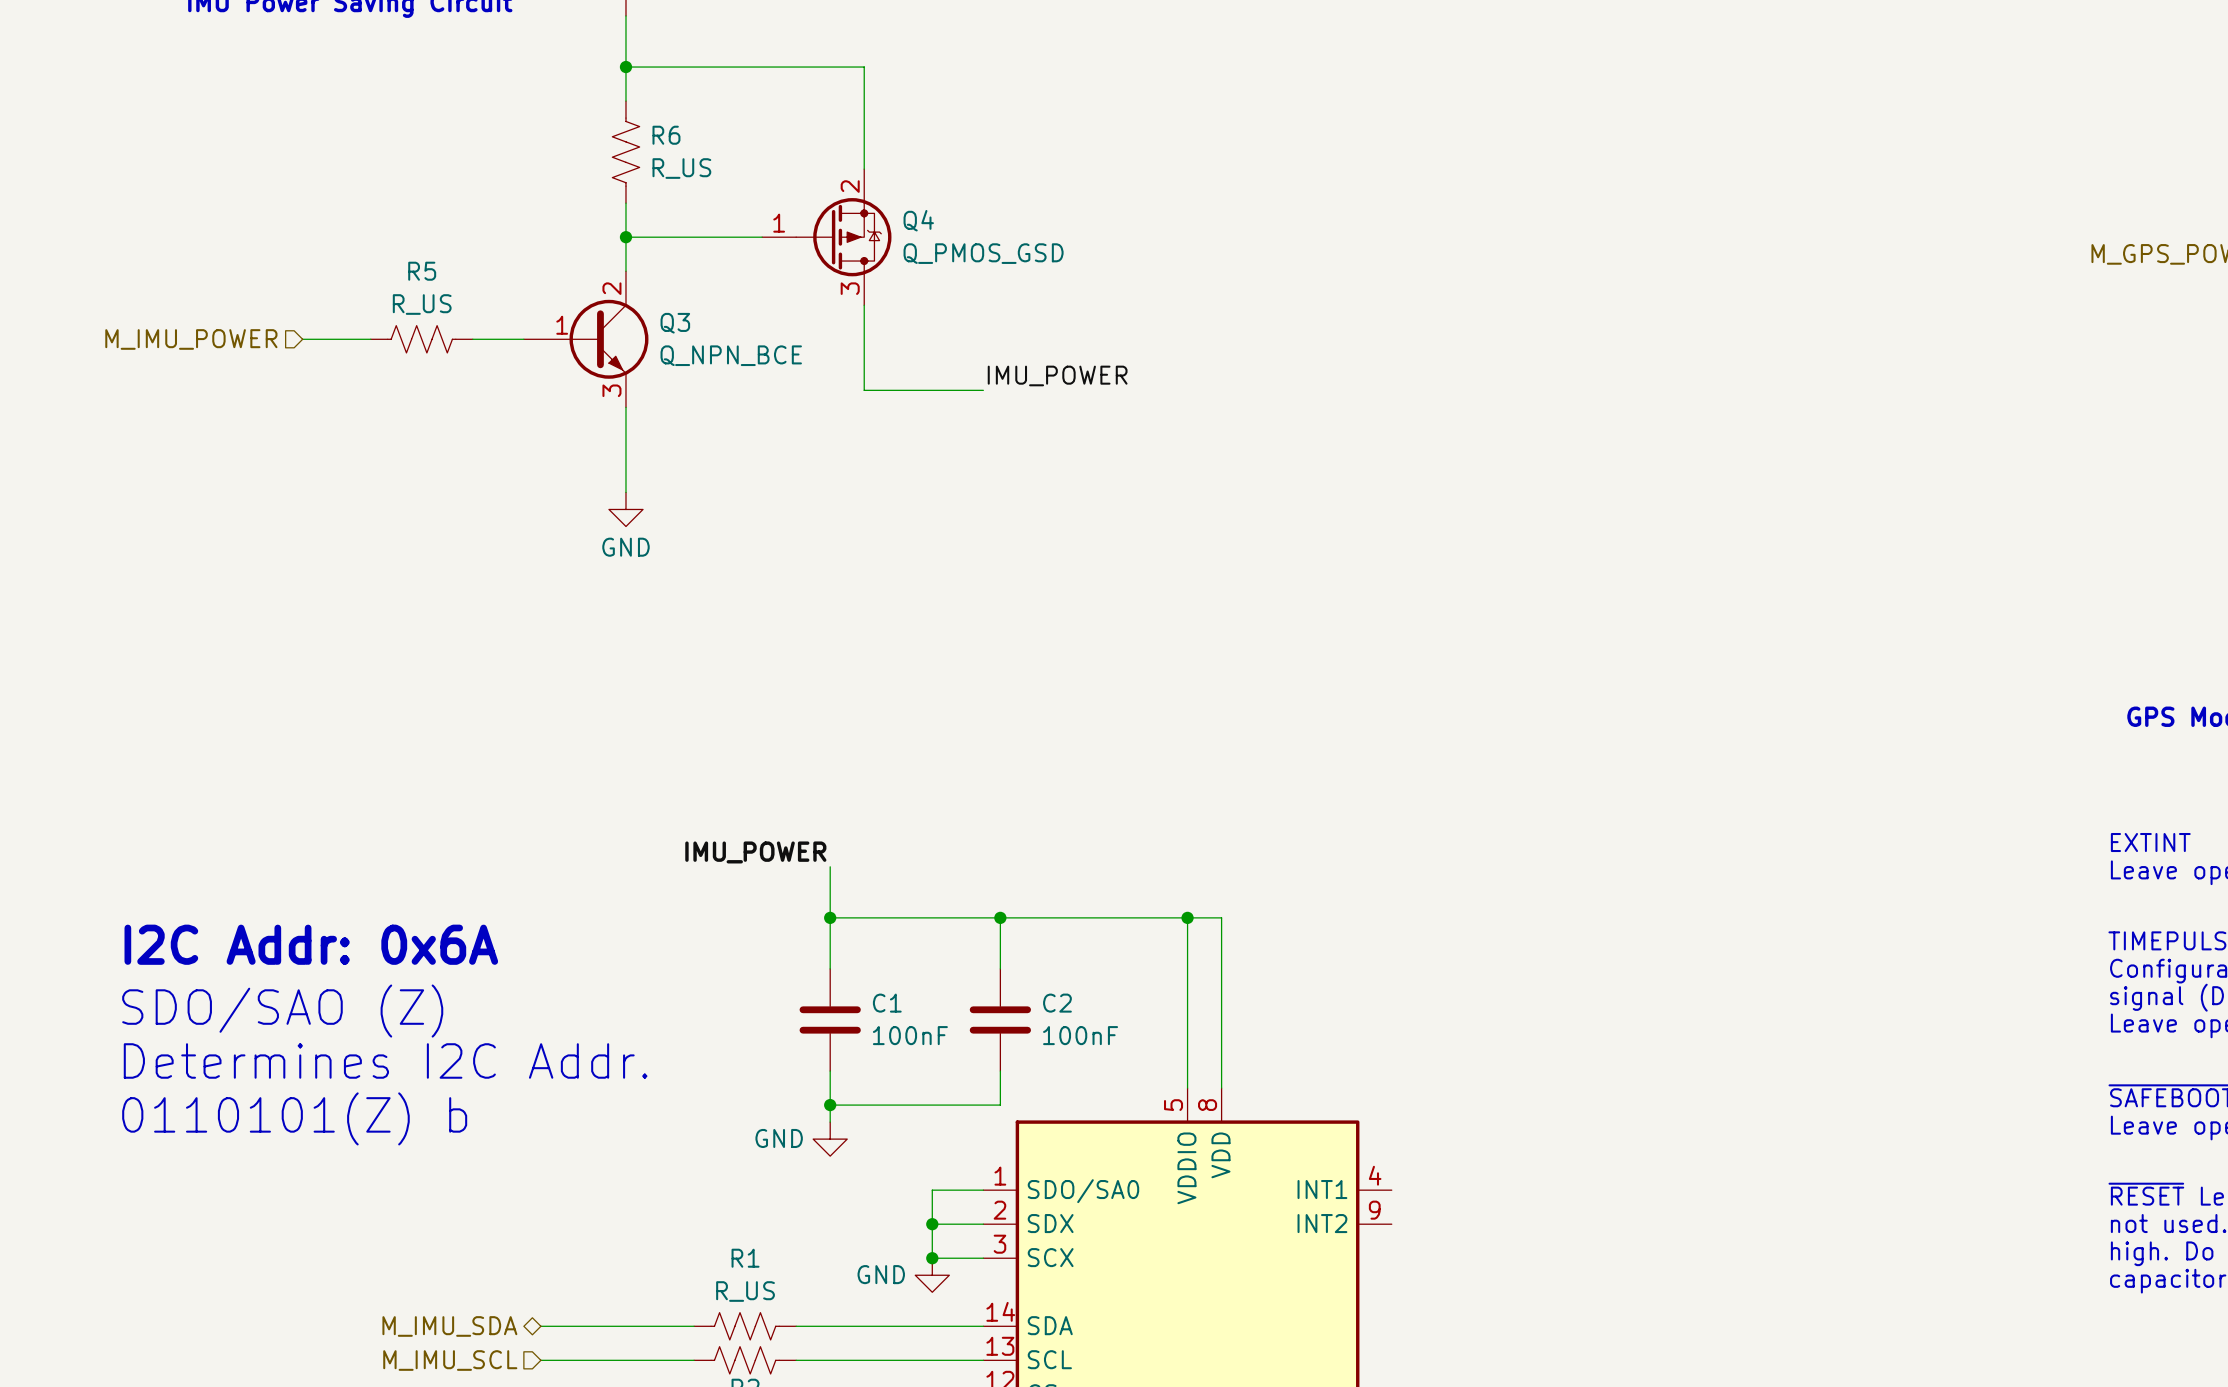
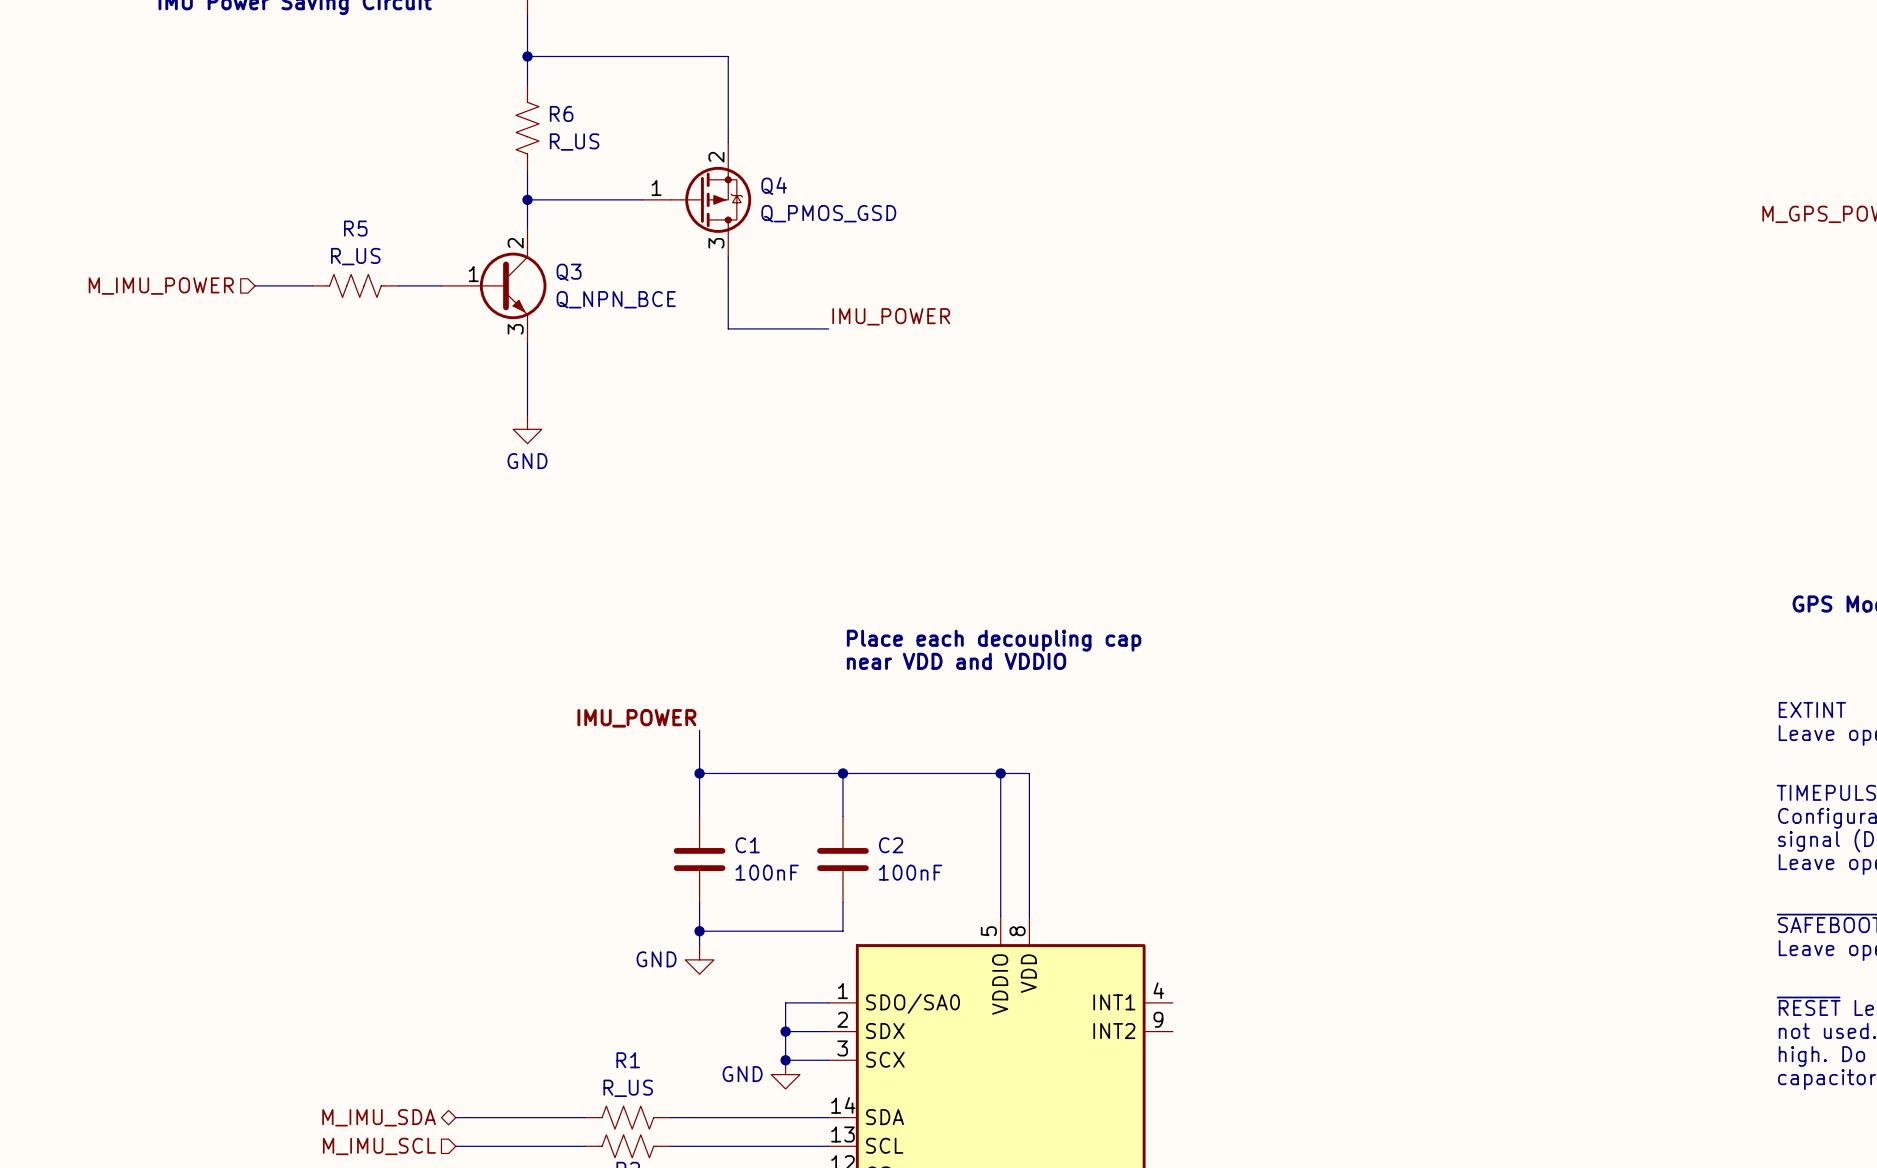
text: none -> Place each decoupling cap (994, 640)
text: none -> near VDD and VDDIO (956, 661)
text: I2C Addr: 0x6A (311, 944) -> none
text: SDO/SAO (Z) (282, 1011) -> none
text: Determines I2C Addr. (385, 1060) -> none
text: 0110101(Z) b (294, 1118) -> none

